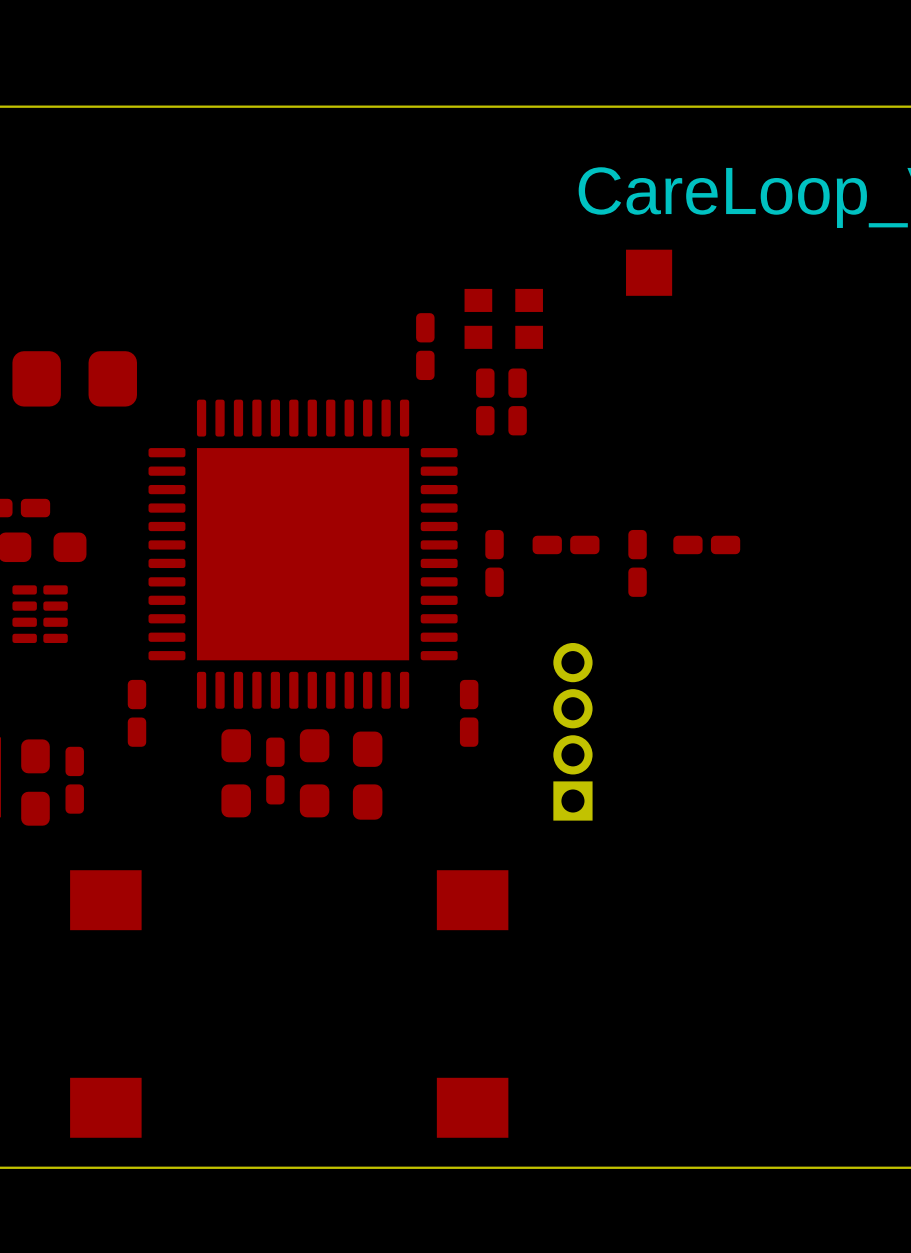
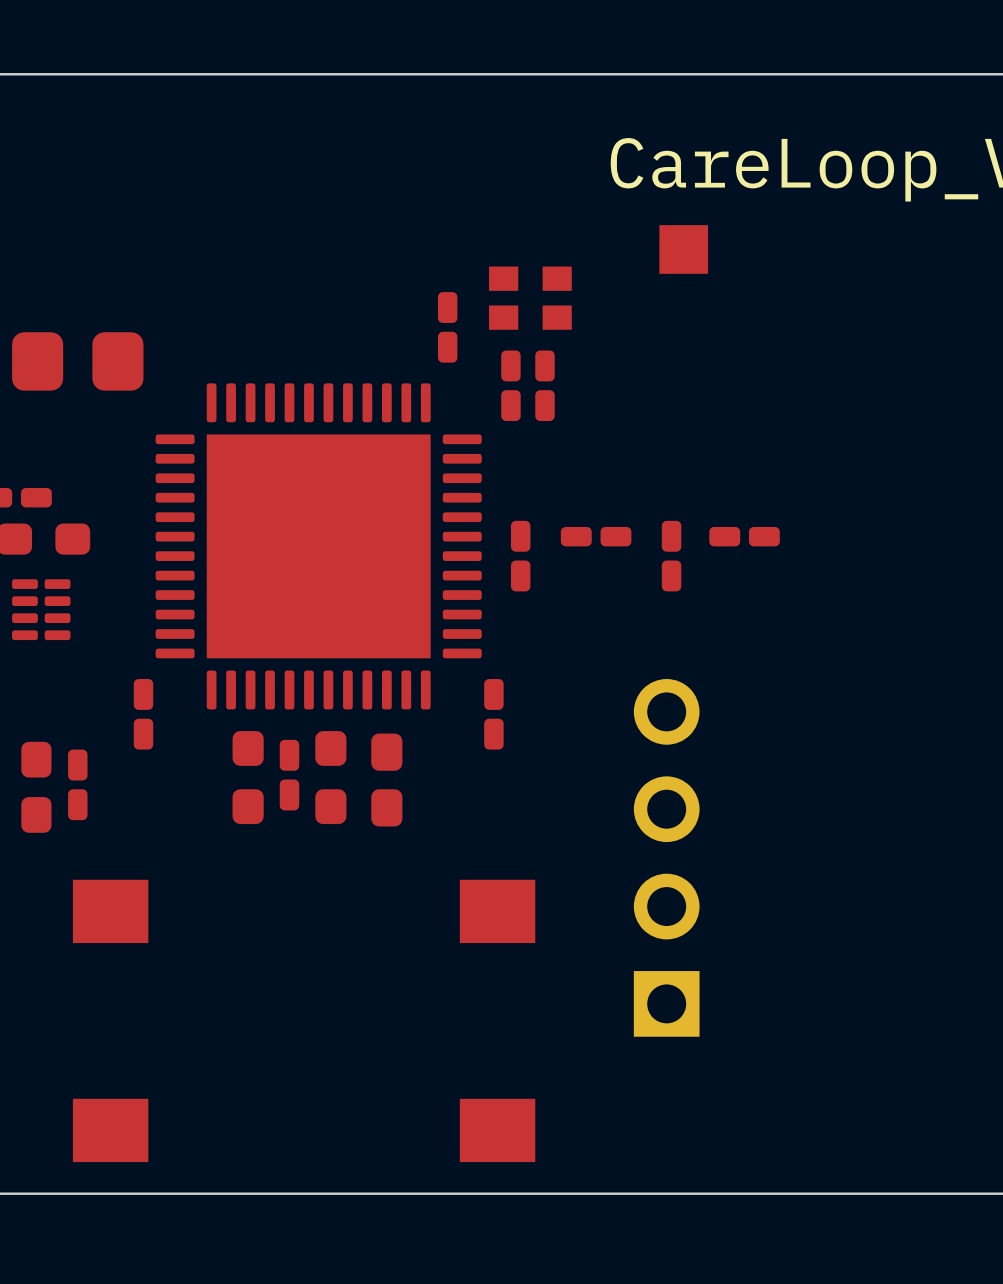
part: (572, 731) -> none
part: none -> (666, 857)

